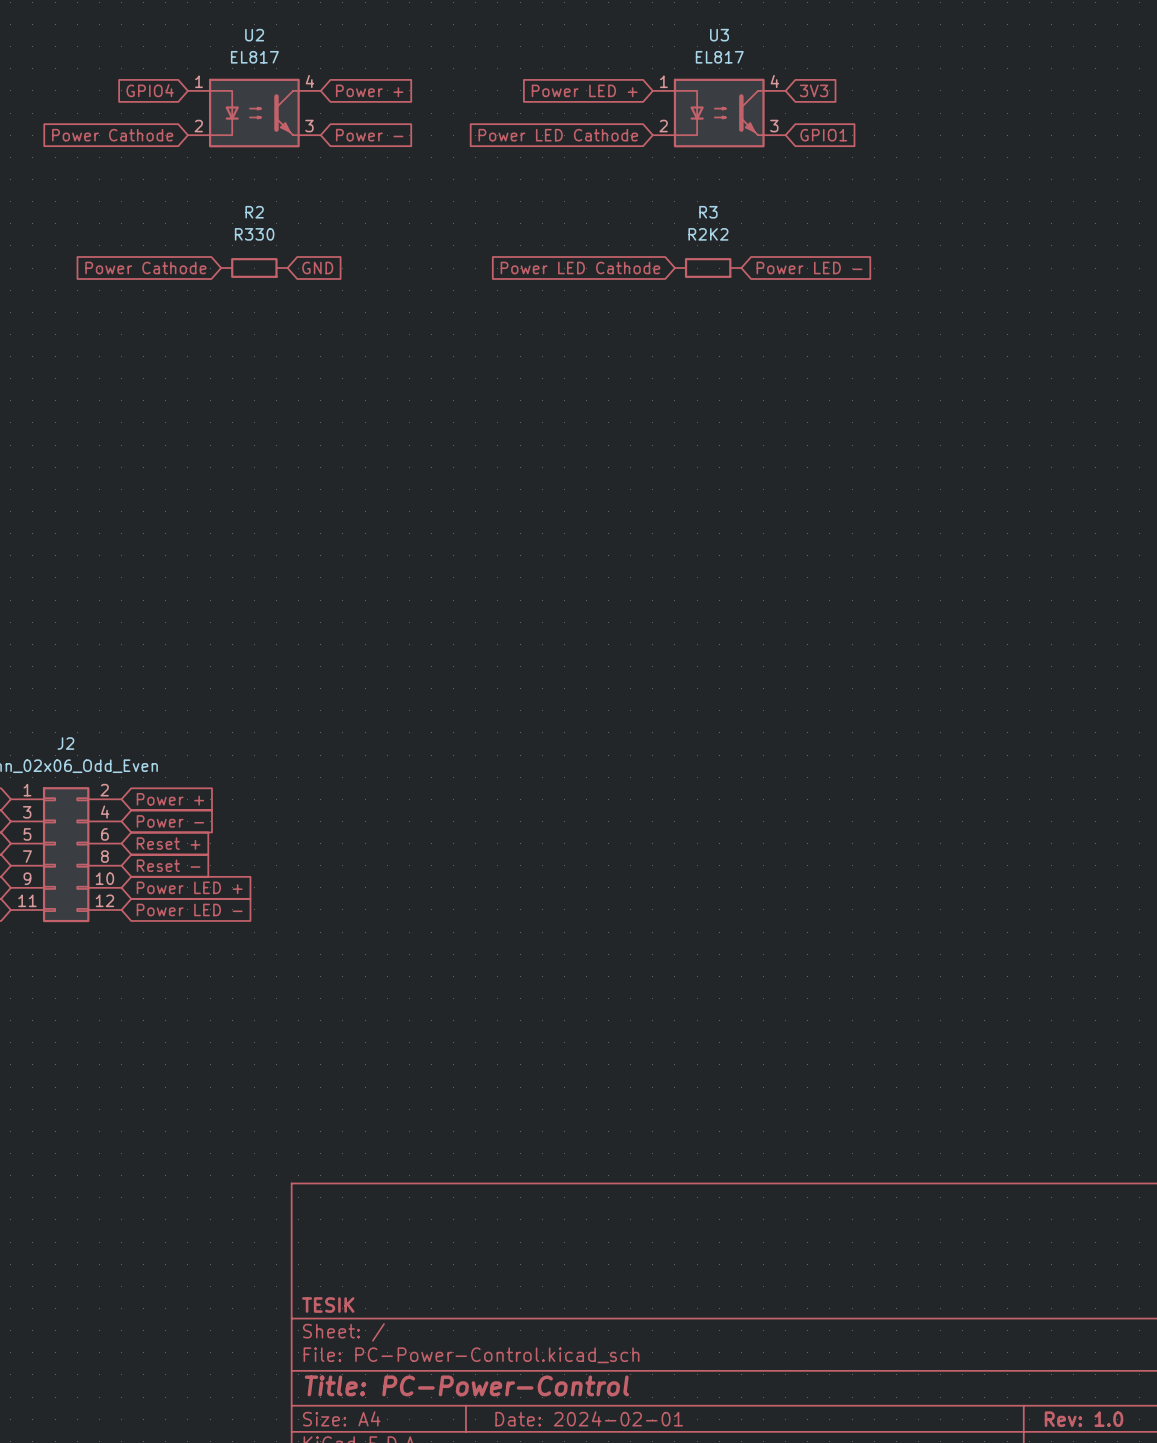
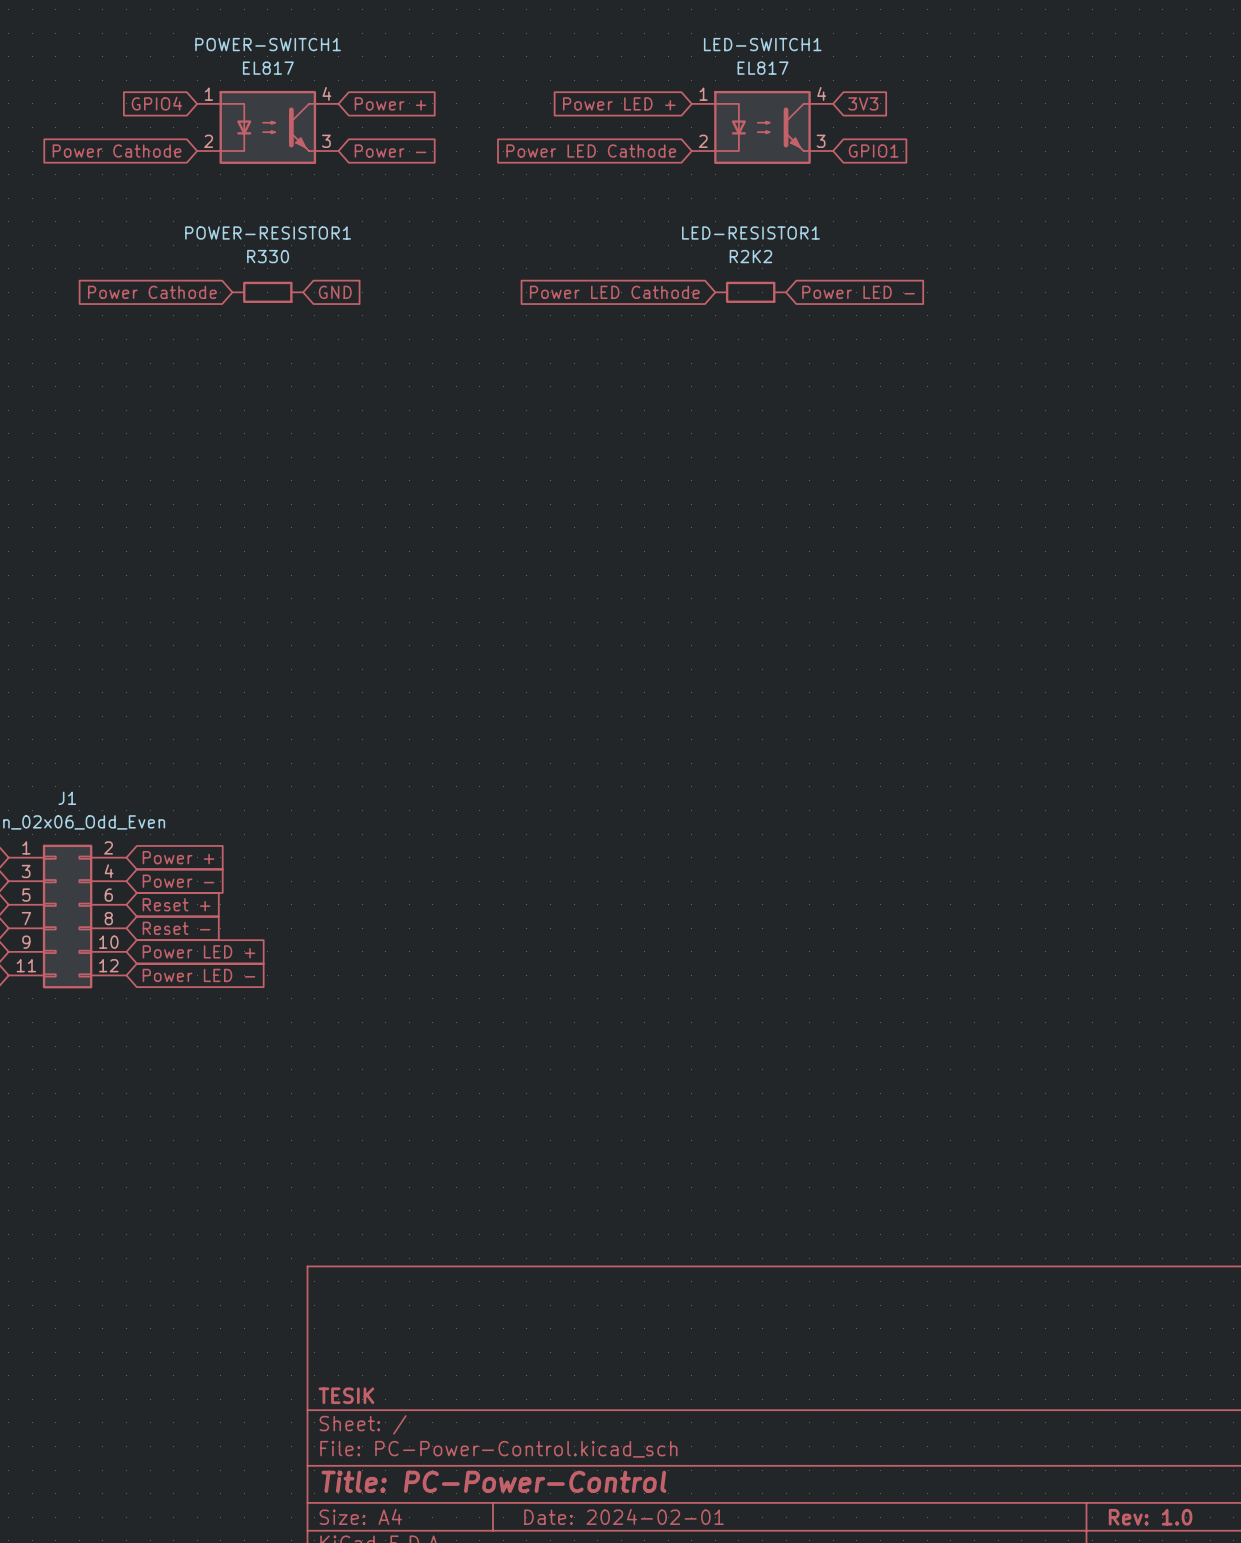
U2 name: U2 (254, 35) -> POWER-SWITCH1 (268, 44)
U3 name: U3 (719, 35) -> LED-SWITCH1 (762, 44)
R2 name: R2 (254, 212) -> POWER-RESISTOR1 (268, 233)
R3 name: R3 (708, 212) -> LED-RESISTOR1 (750, 233)
J2 name: J2 (65, 743) -> J1 (67, 798)

